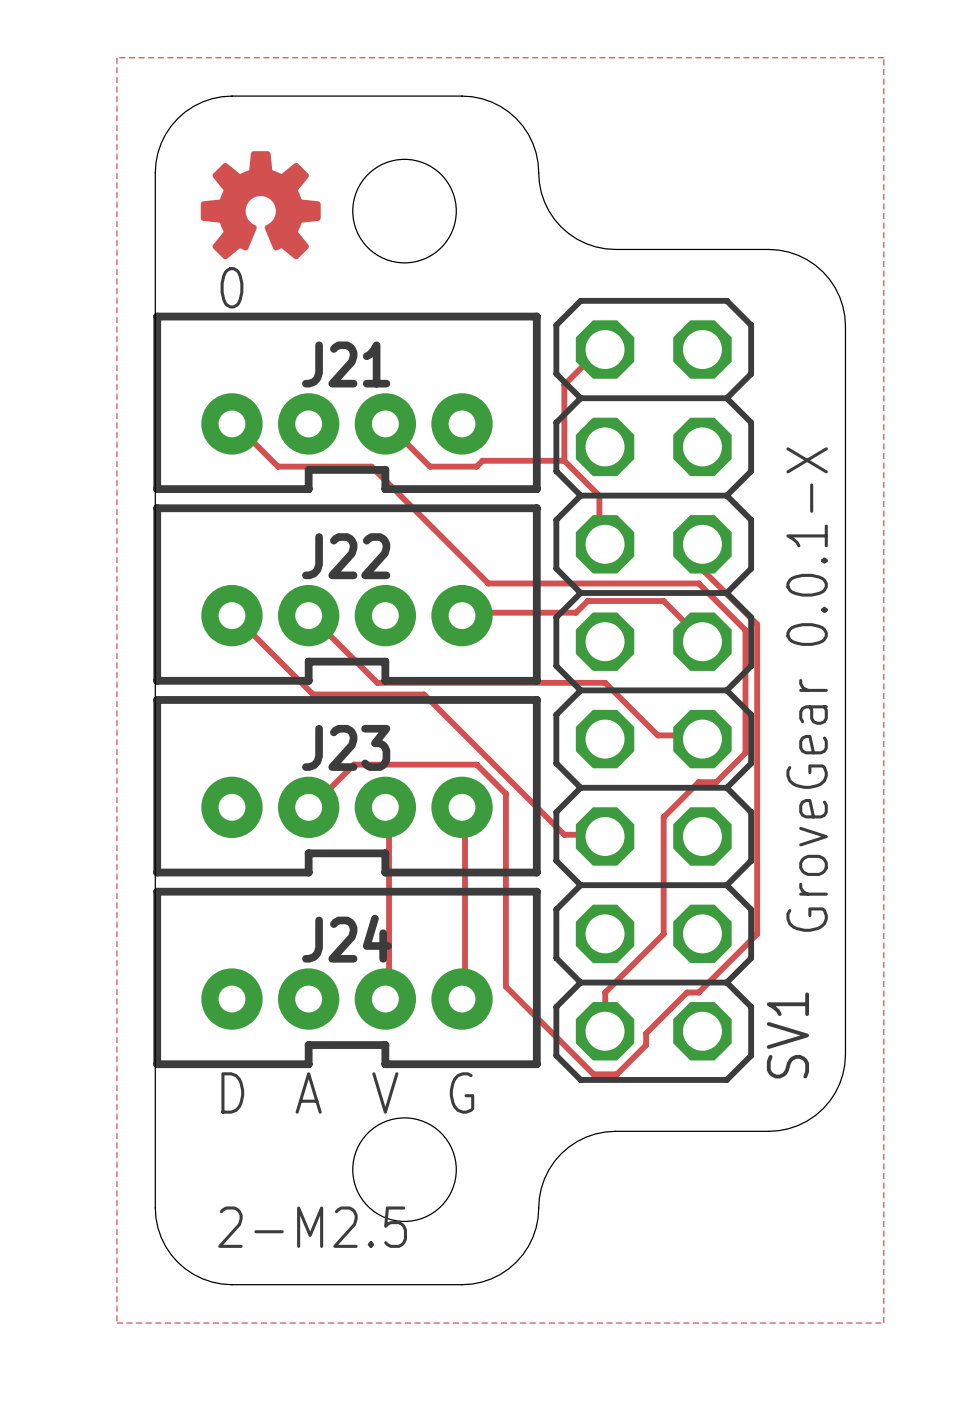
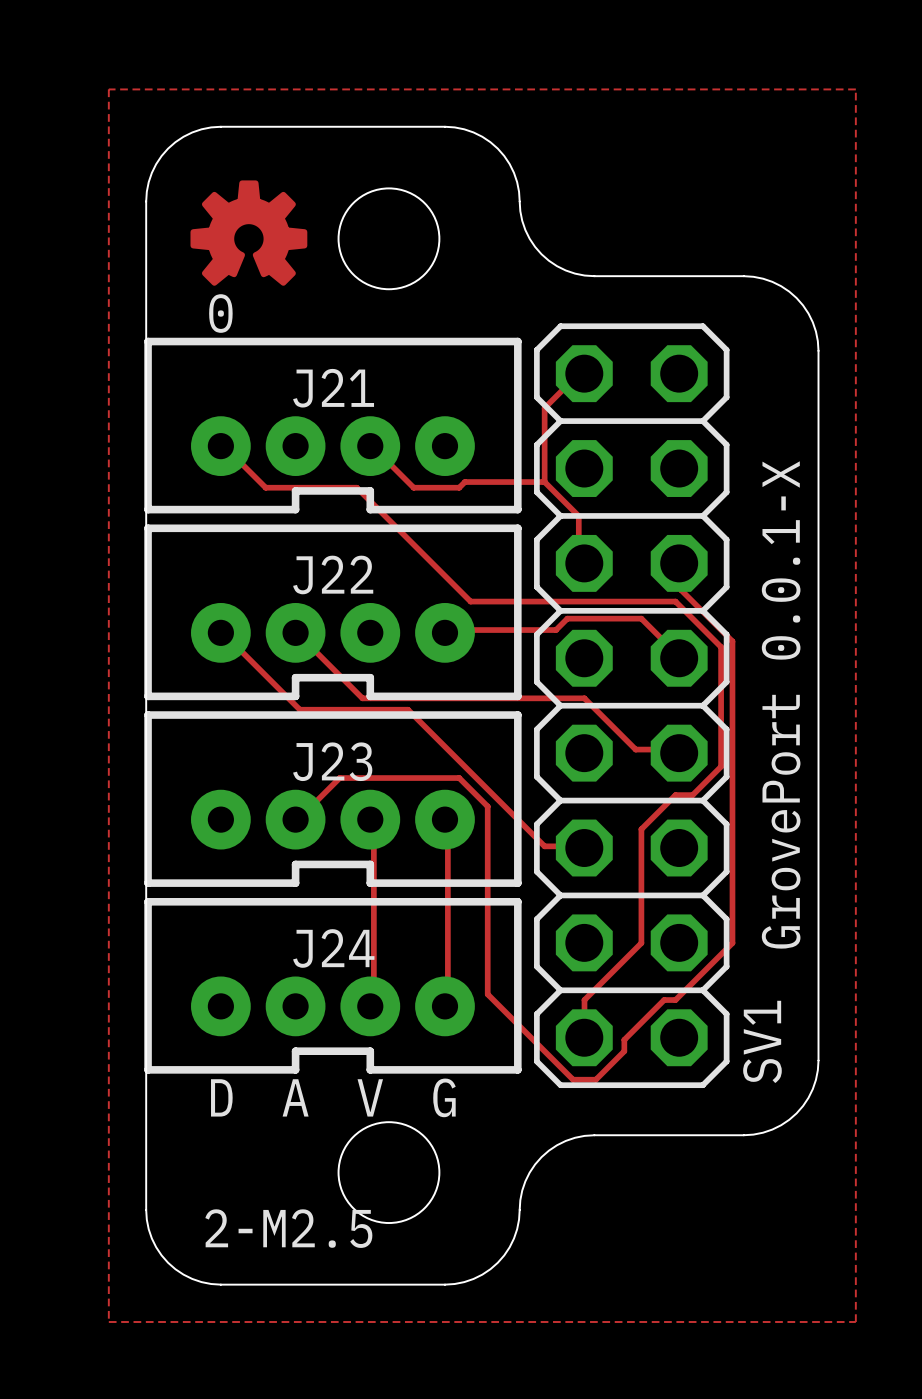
text: GroveGear 0.0.1-X (807, 689) -> GrovePort 0.0.1-X (781, 704)

